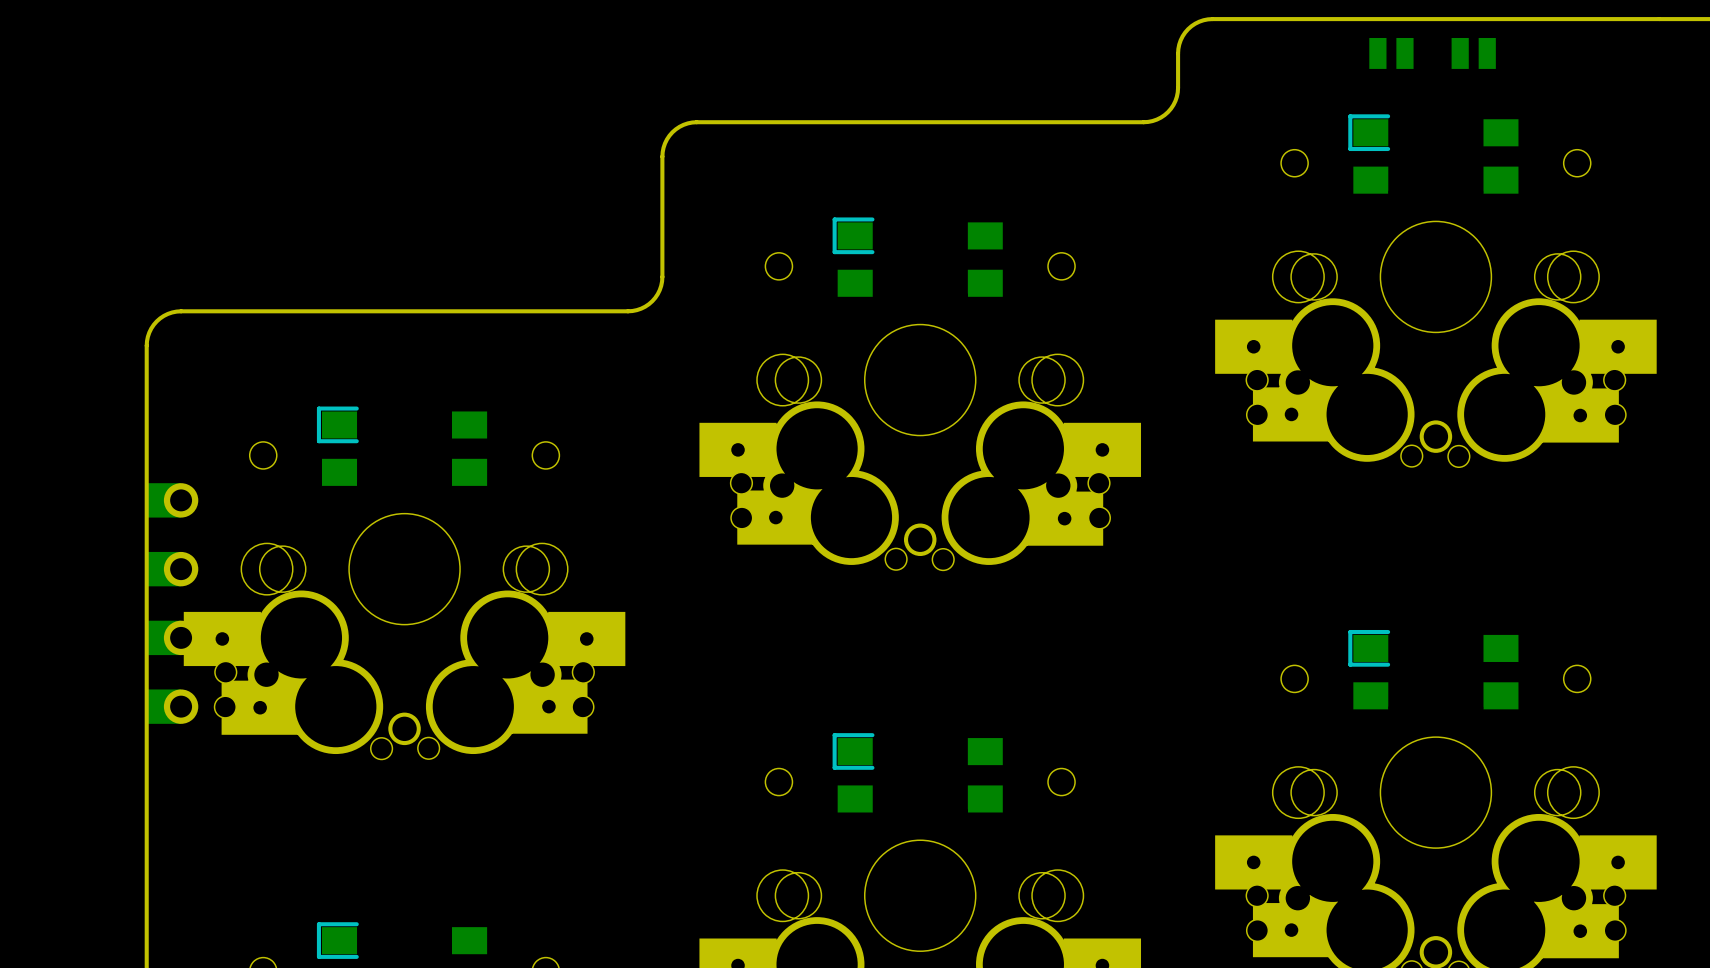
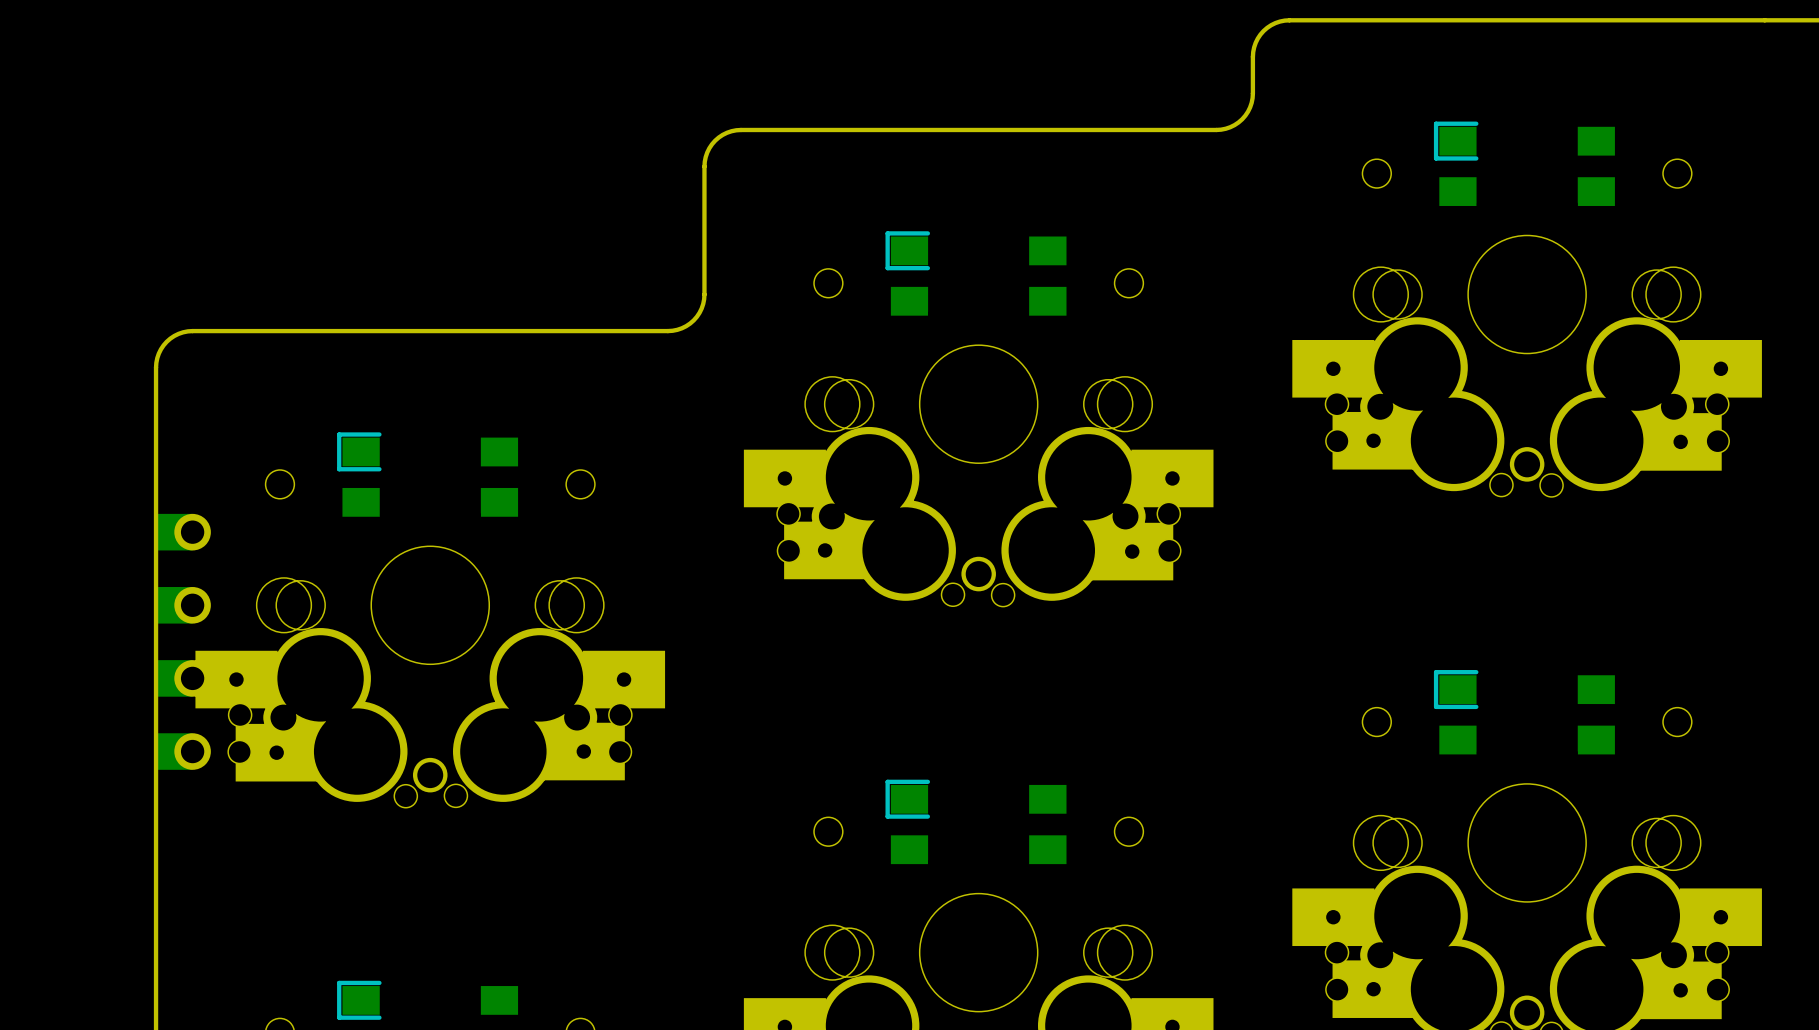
part: (1391, 53) -> none
part: (1473, 53) -> none

